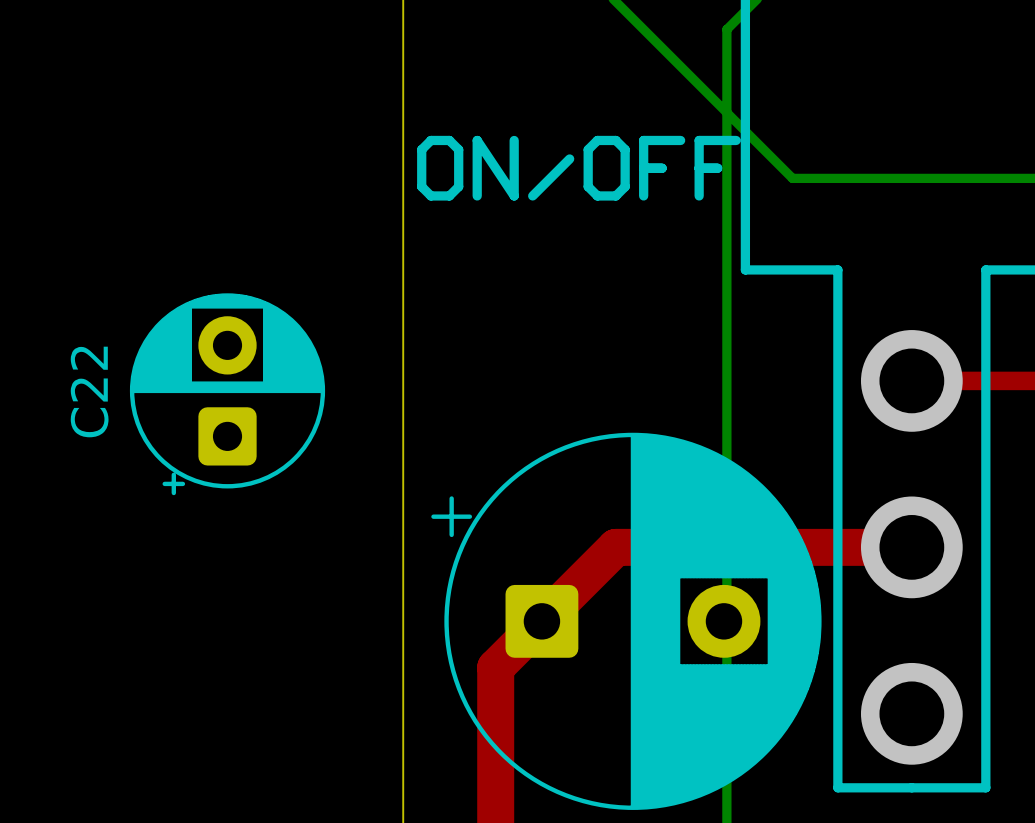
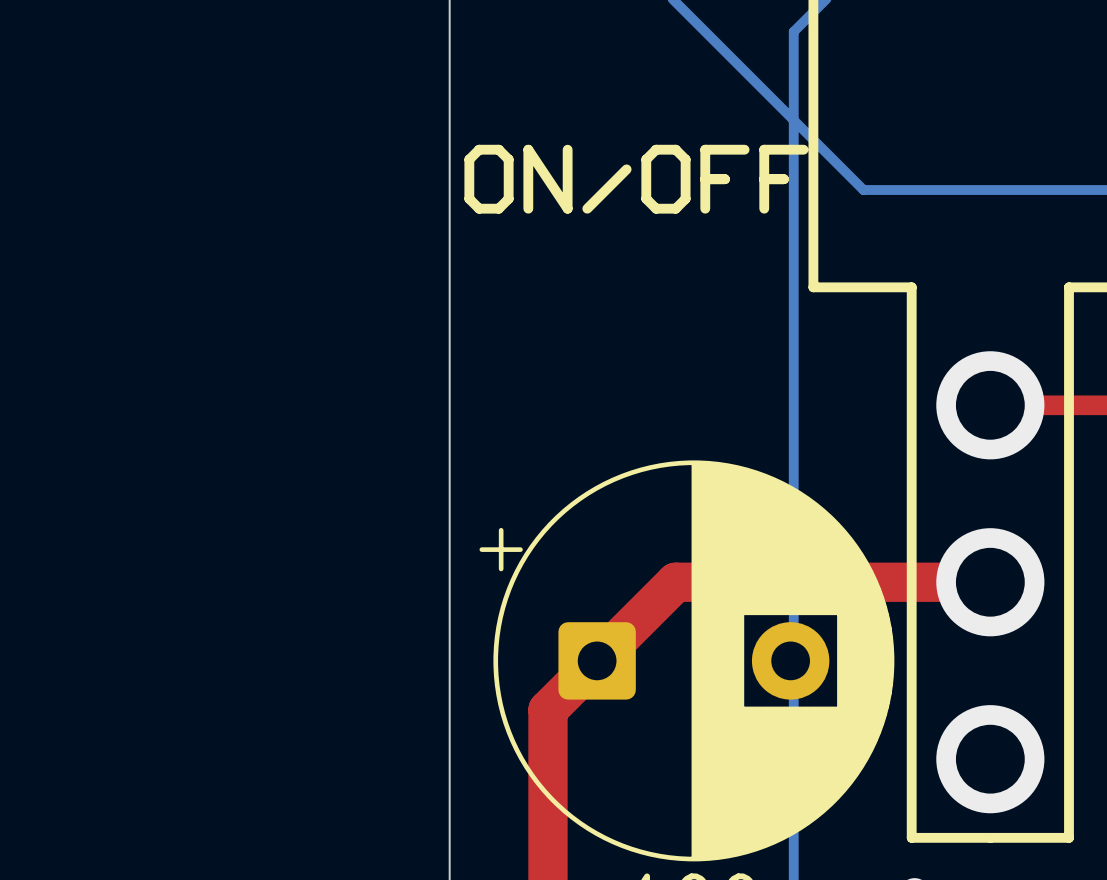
C22: (227, 394) -> none

